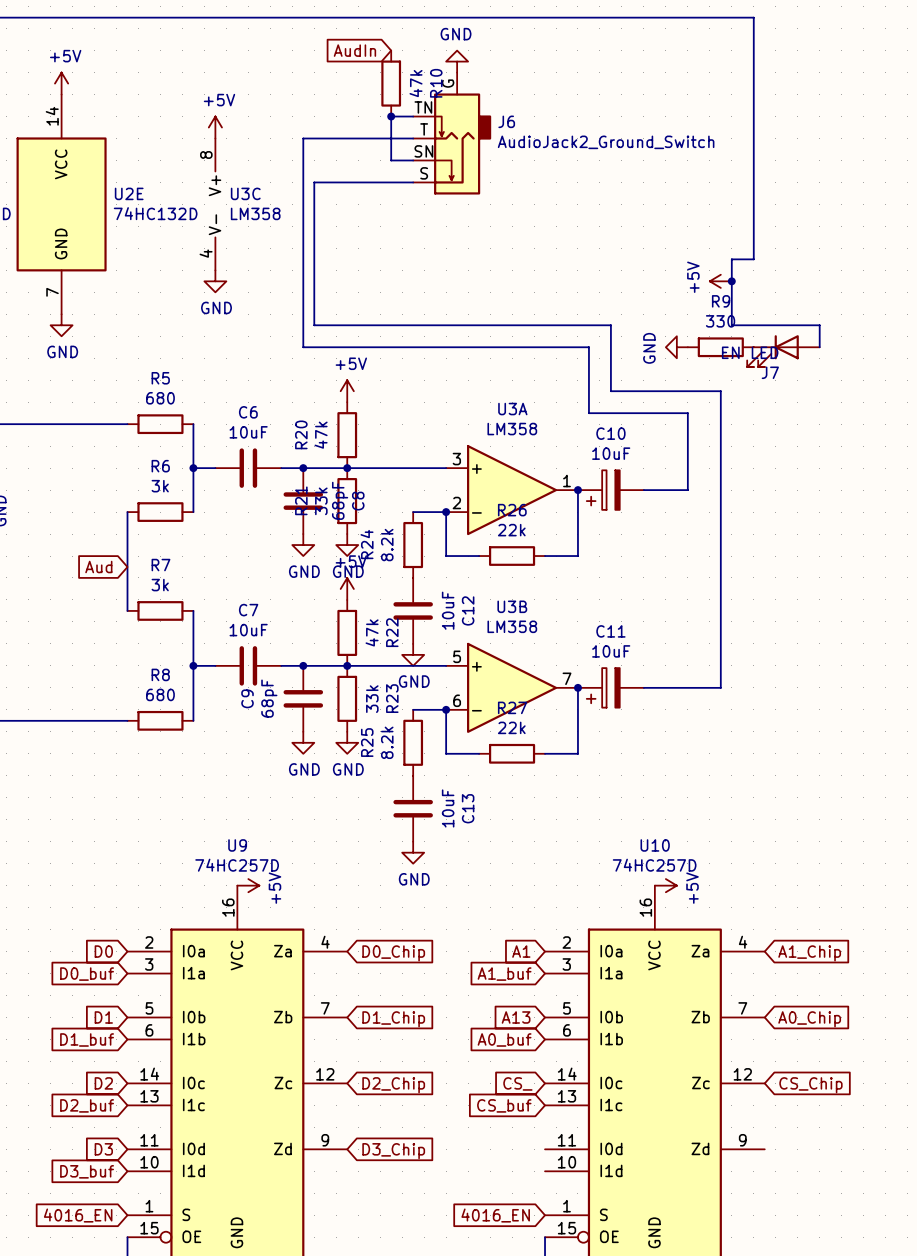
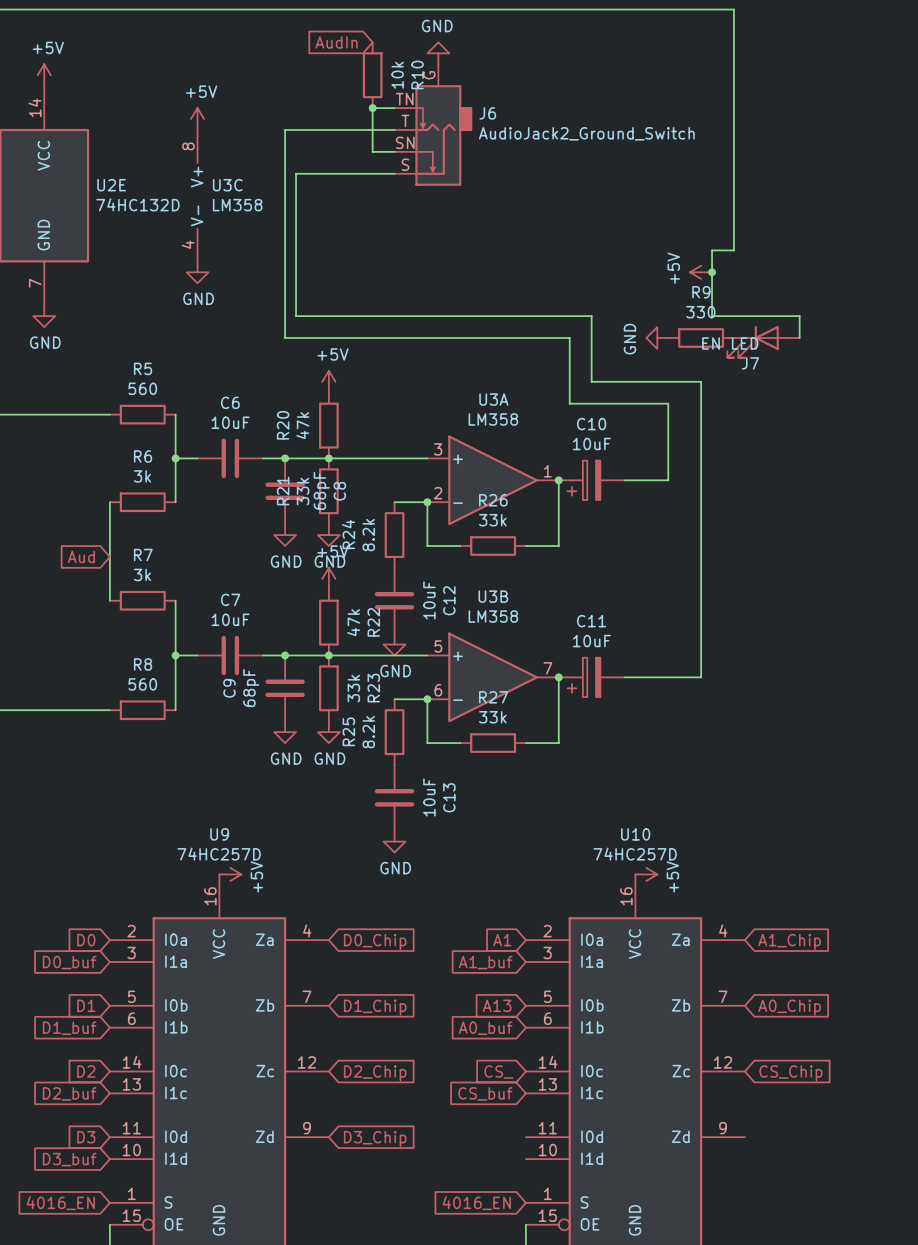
R10 value: 47k (416, 83) -> 10k (397, 75)
R5 value: 680 (160, 398) -> 560 (142, 388)
R26 value: 22k (511, 530) -> 33k (492, 520)
R8 value: 680 (160, 694) -> 560 (142, 684)
R27 value: 22k (511, 727) -> 33k (492, 717)

